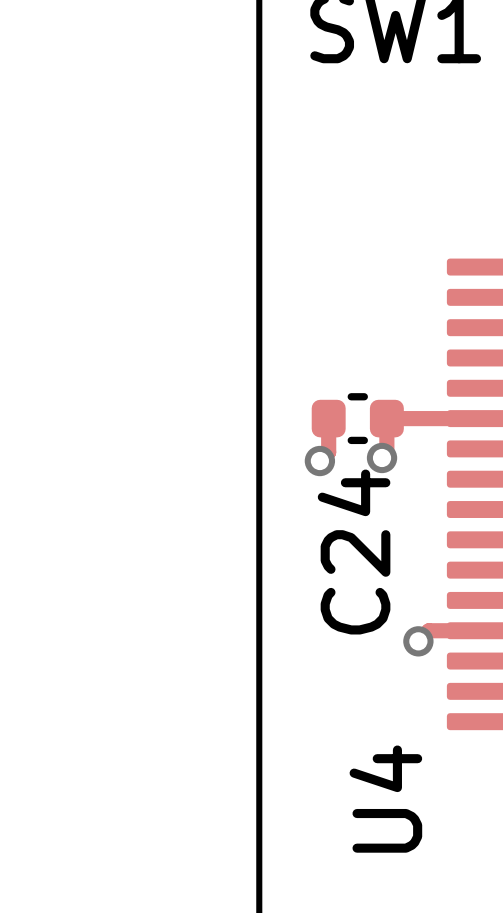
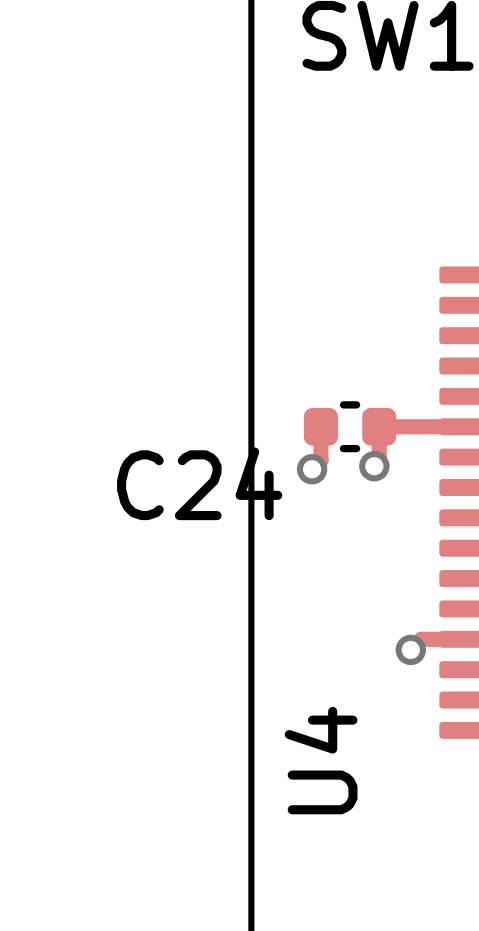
C24 name rotation: 0° (354, 552) -> 90° clockwise (199, 483)
U4 name position: U4 (385, 799) -> U4 (321, 760)

